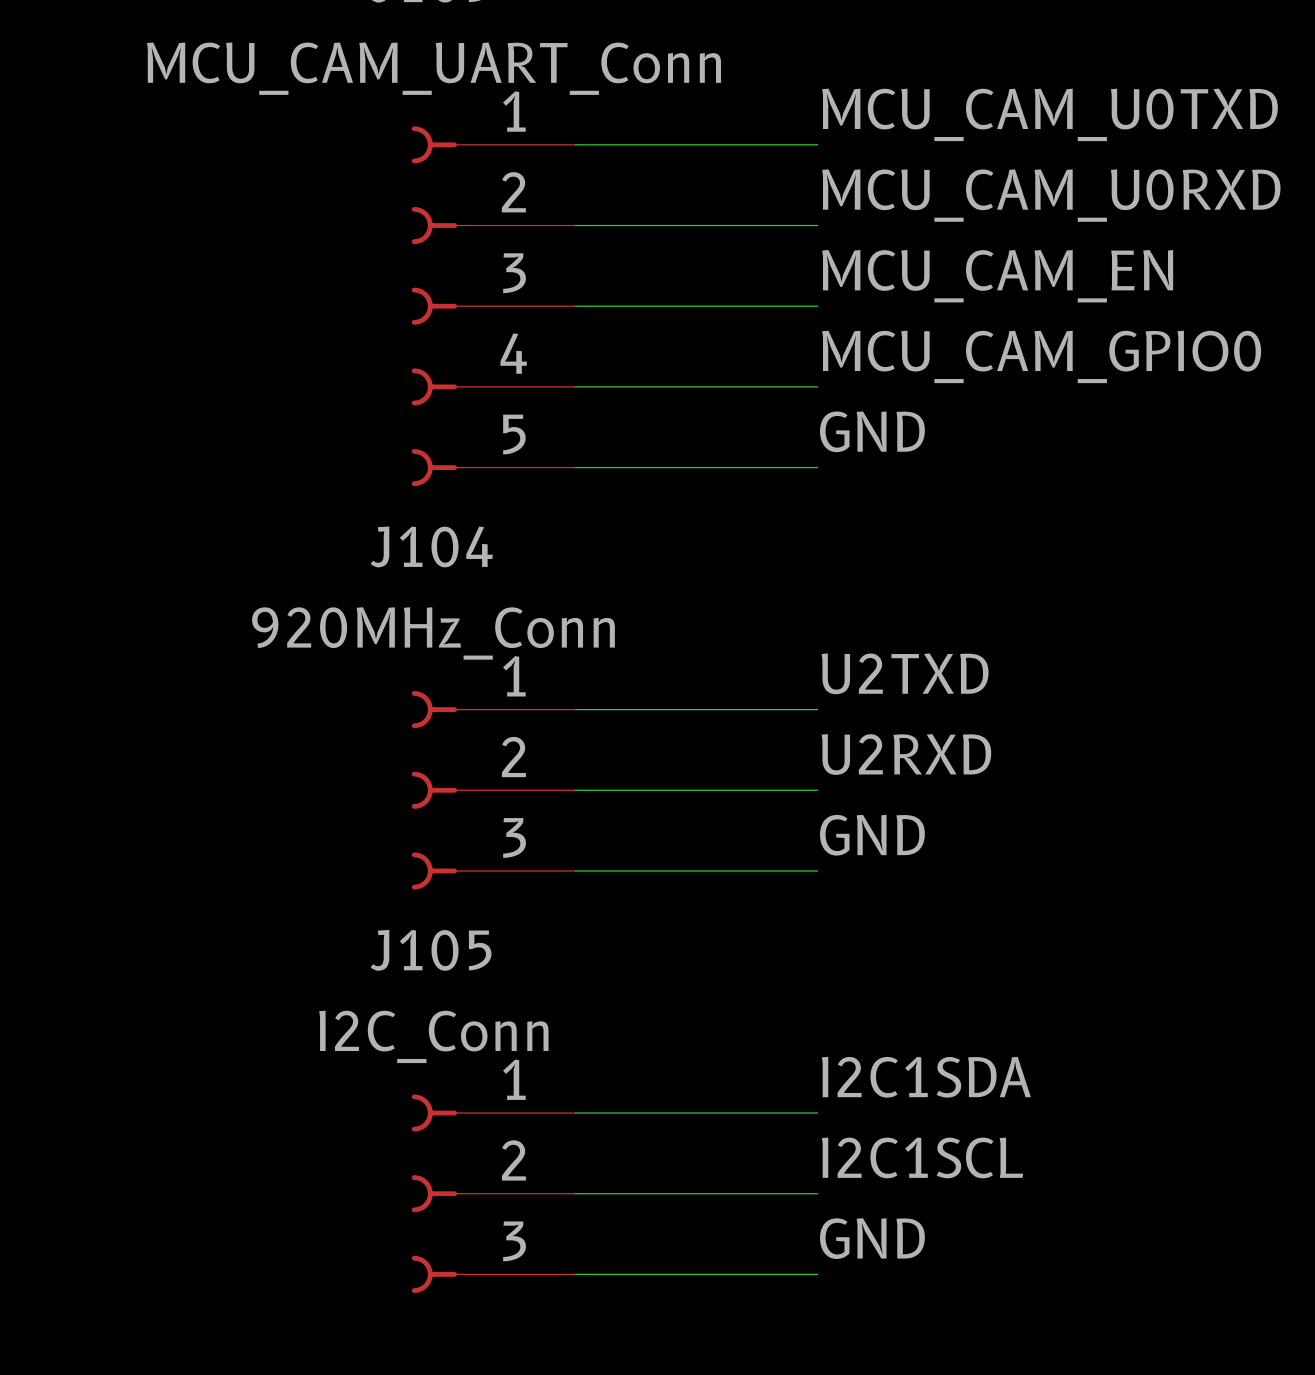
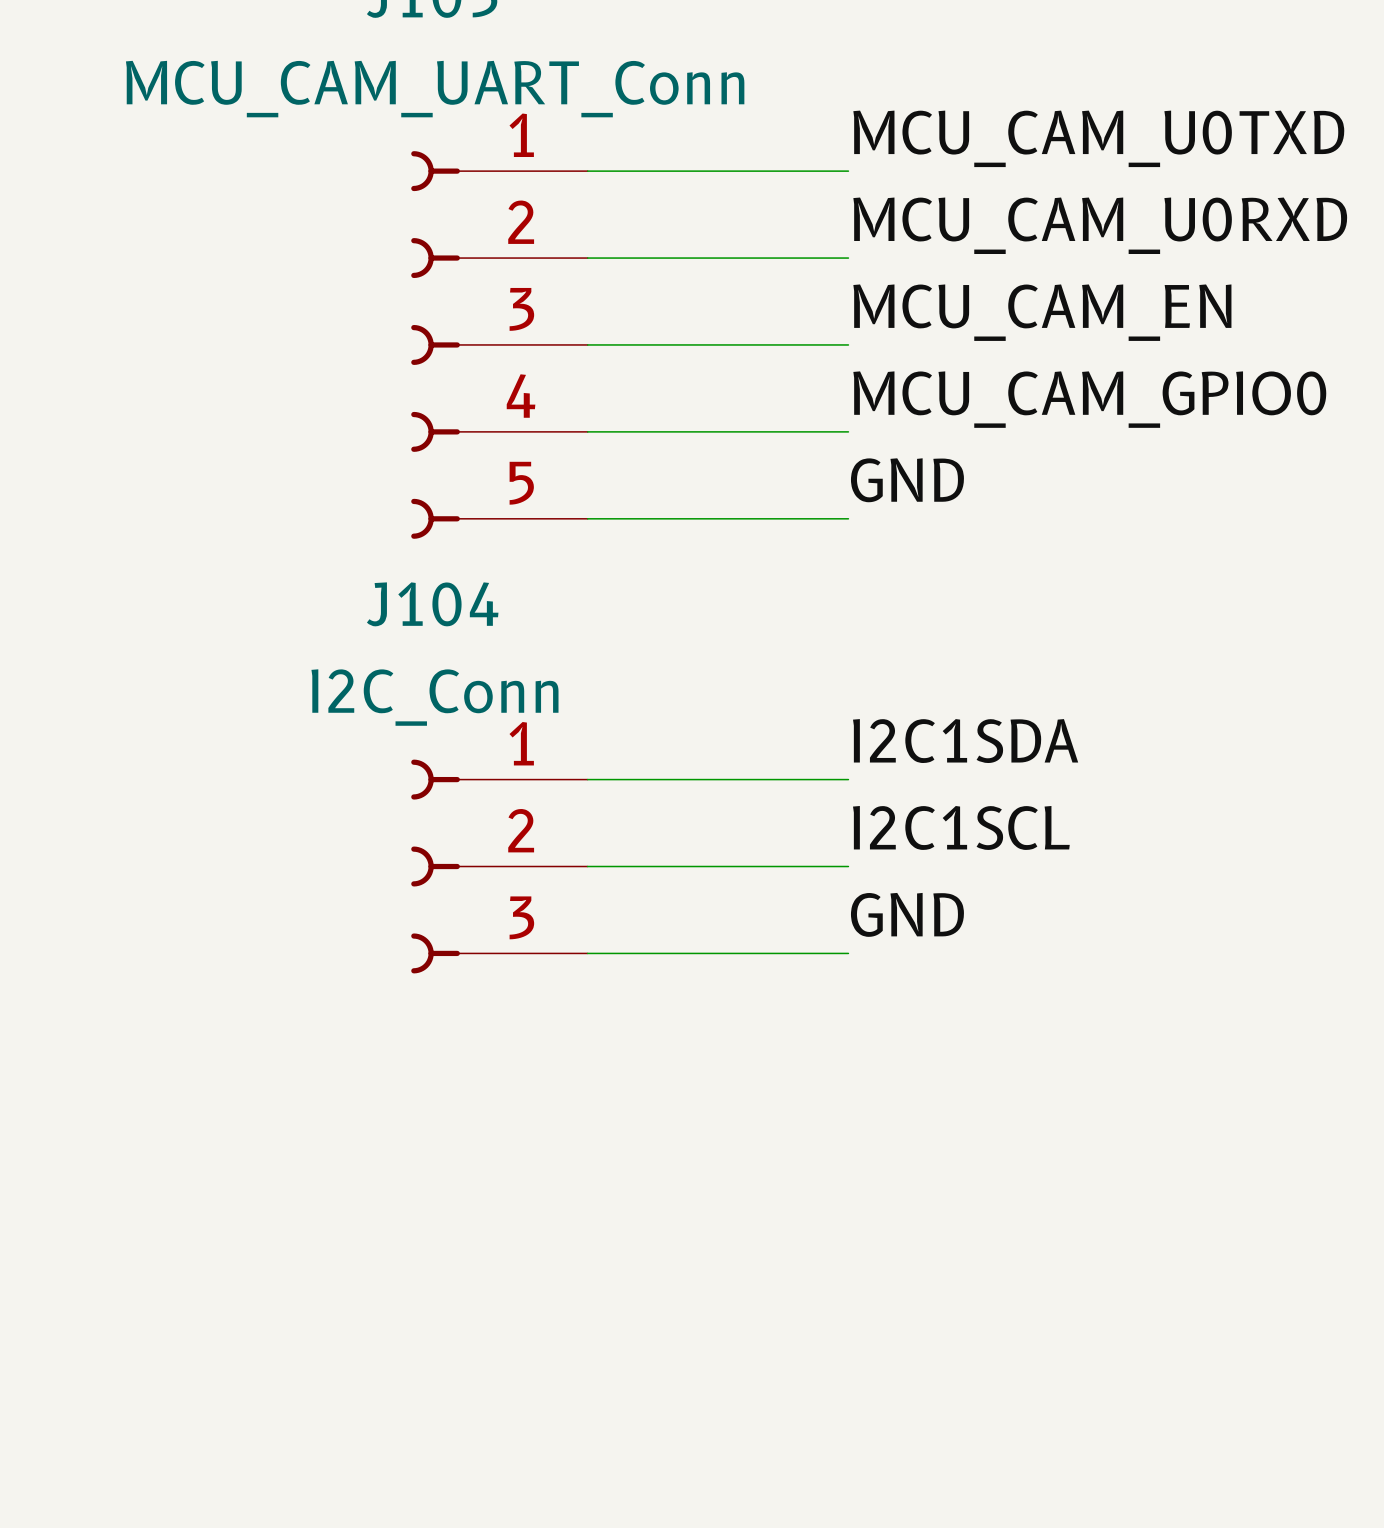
J104 value: 920MHz_Conn (433, 633) -> I2C_Conn (434, 697)
label: U2TXD (905, 673) -> I2C1SDA (965, 741)
label: U2RXD (906, 754) -> I2C1SCL (961, 827)
label: I2C1SDA (926, 1077) -> none
wire: (575, 1113) (817, 1113) -> none
label: I2C1SCL (922, 1157) -> none
J105: I2C_Conn (493, 1193) -> none
wire: (575, 1193) (817, 1193) -> none
label: GND (872, 1238) -> none
wire: (575, 1274) (817, 1274) -> none

